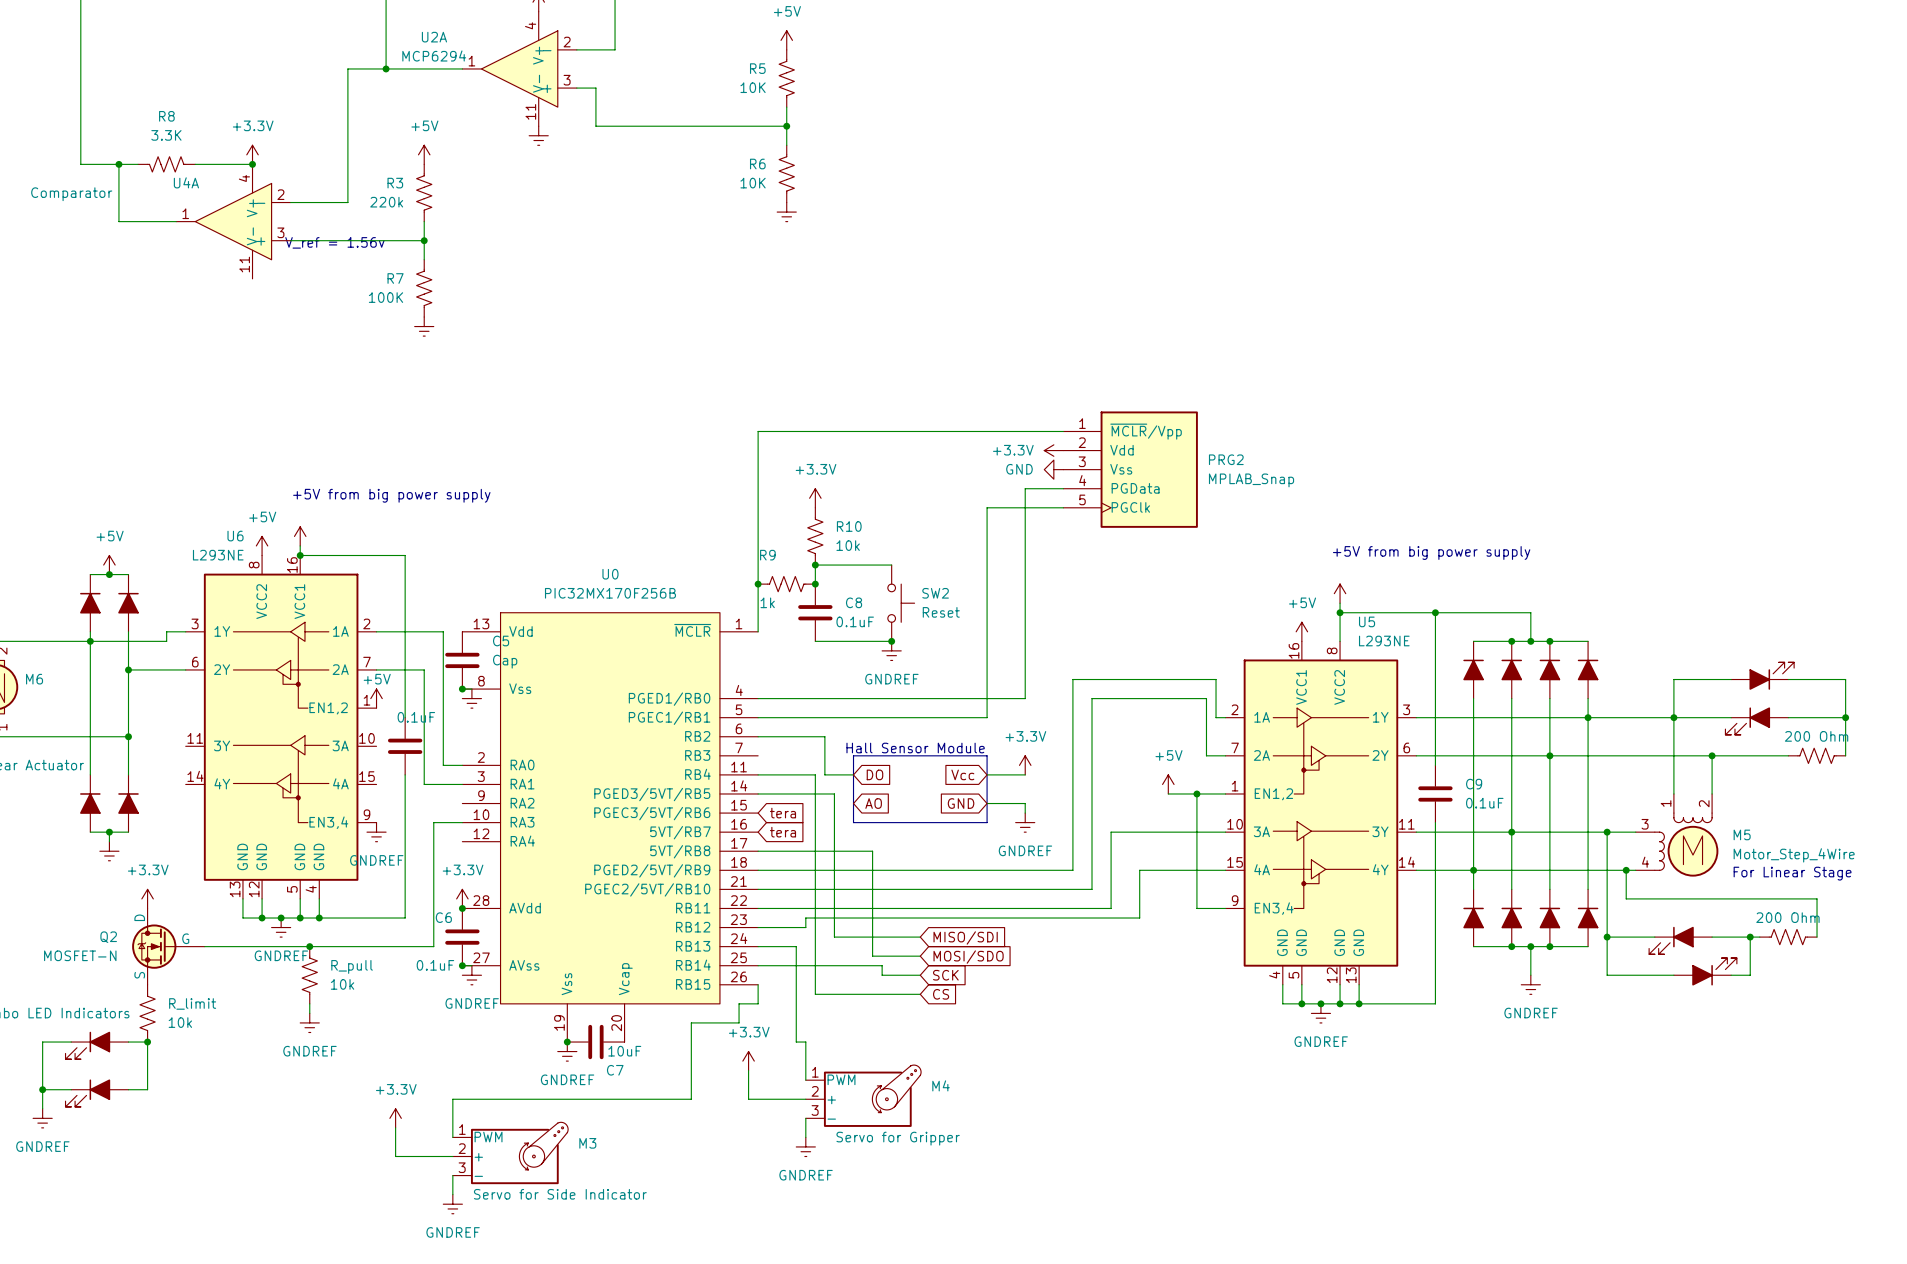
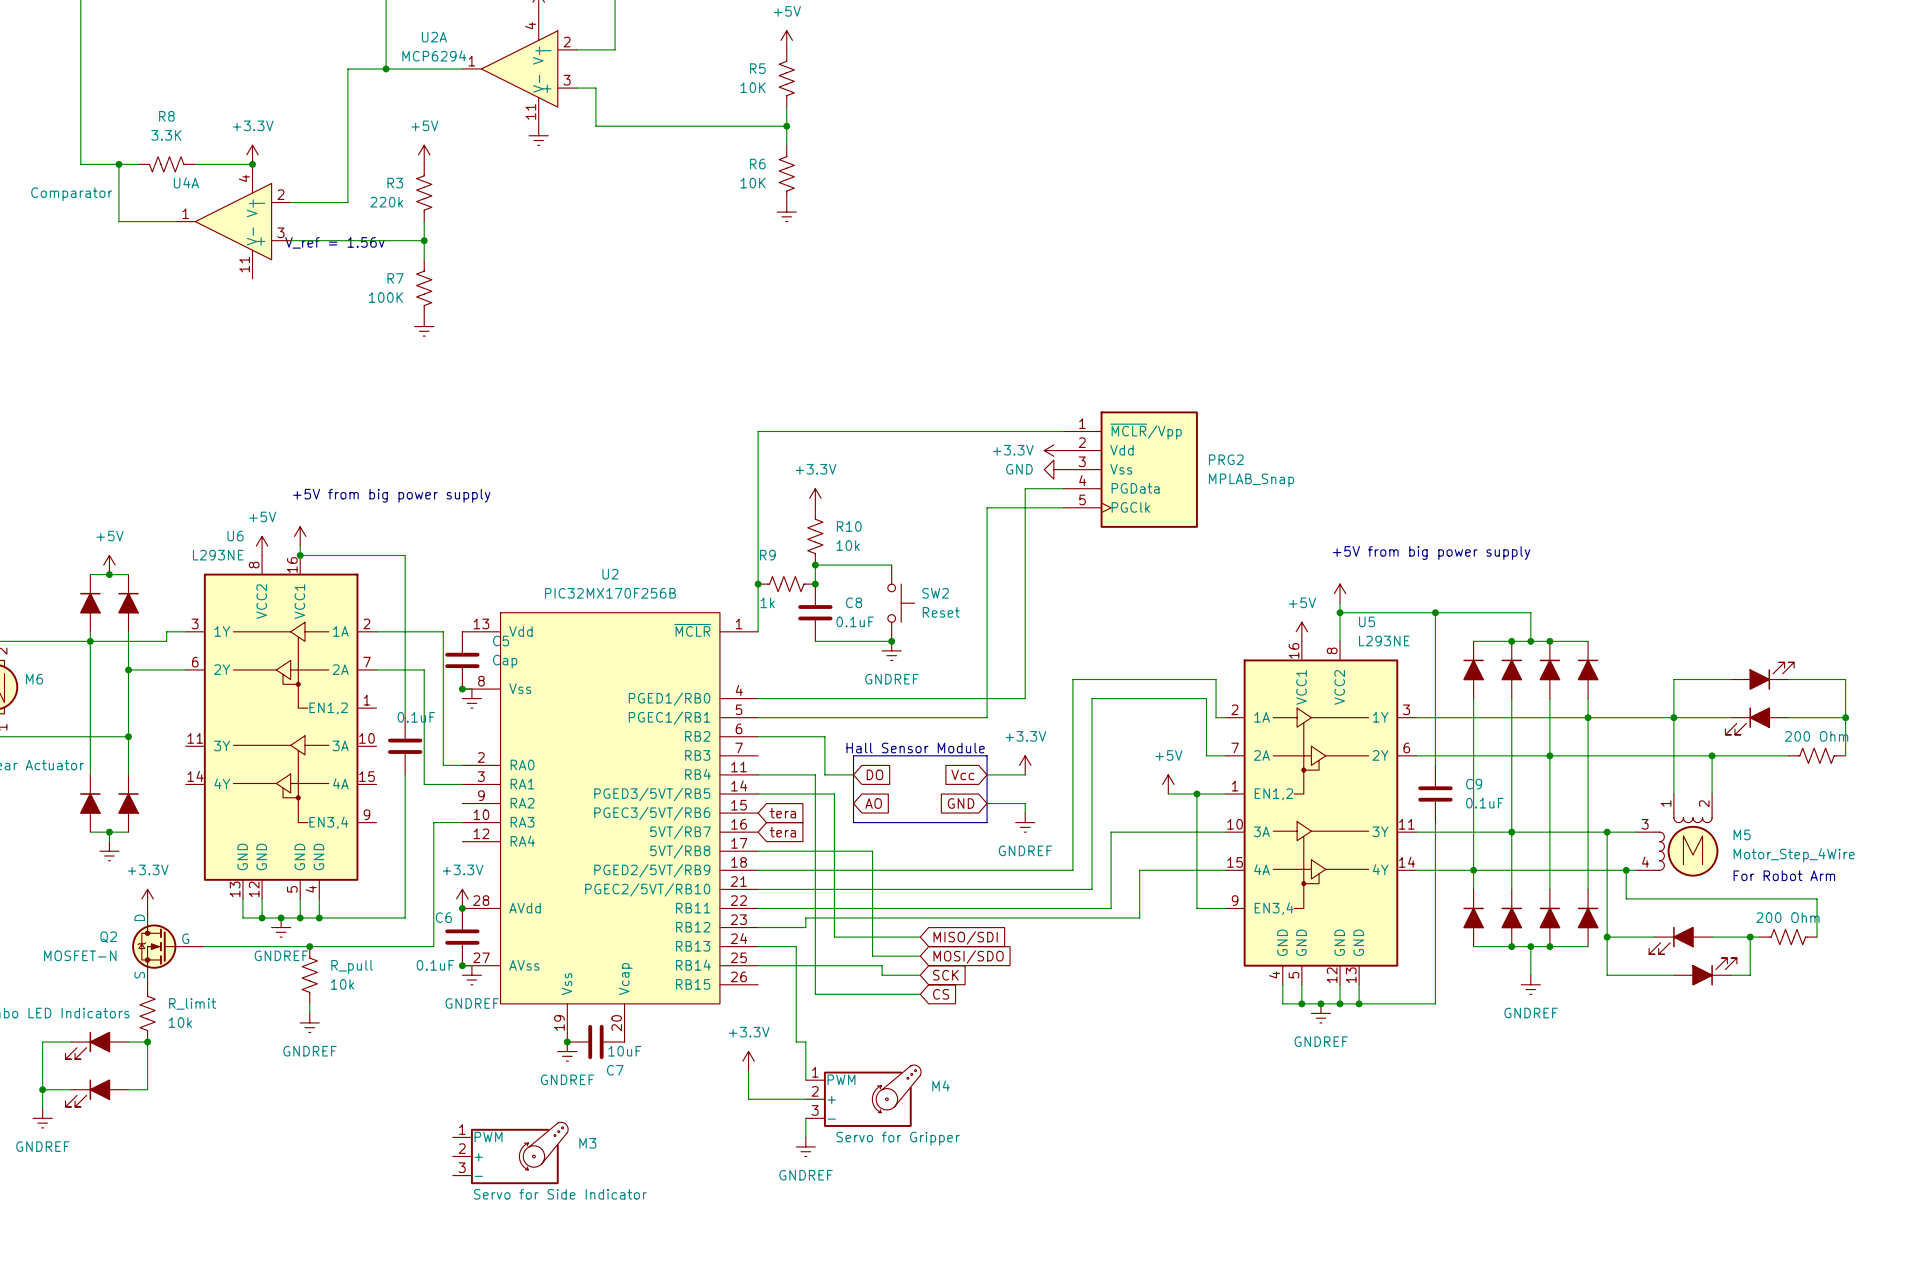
U0 name: U0 (610, 574) -> U2 (610, 574)
power symbol: +5V (376, 698) -> none
power symbol: GNDREF (376, 832) -> none
text: For Linear Stage (1792, 873) -> For Robot Arm (1784, 875)
wire: (758, 984) (758, 1003) (739, 1003) (739, 1022) (691, 1022) (691, 1099) (452, 1099) (452, 1137) -> none
power symbol: +3.3V (395, 1118) -> none
wire: (395, 1127) (395, 1156) (452, 1156) -> none
wire: (452, 1175) (452, 1194) -> none
power symbol: GNDREF (452, 1204) -> none

